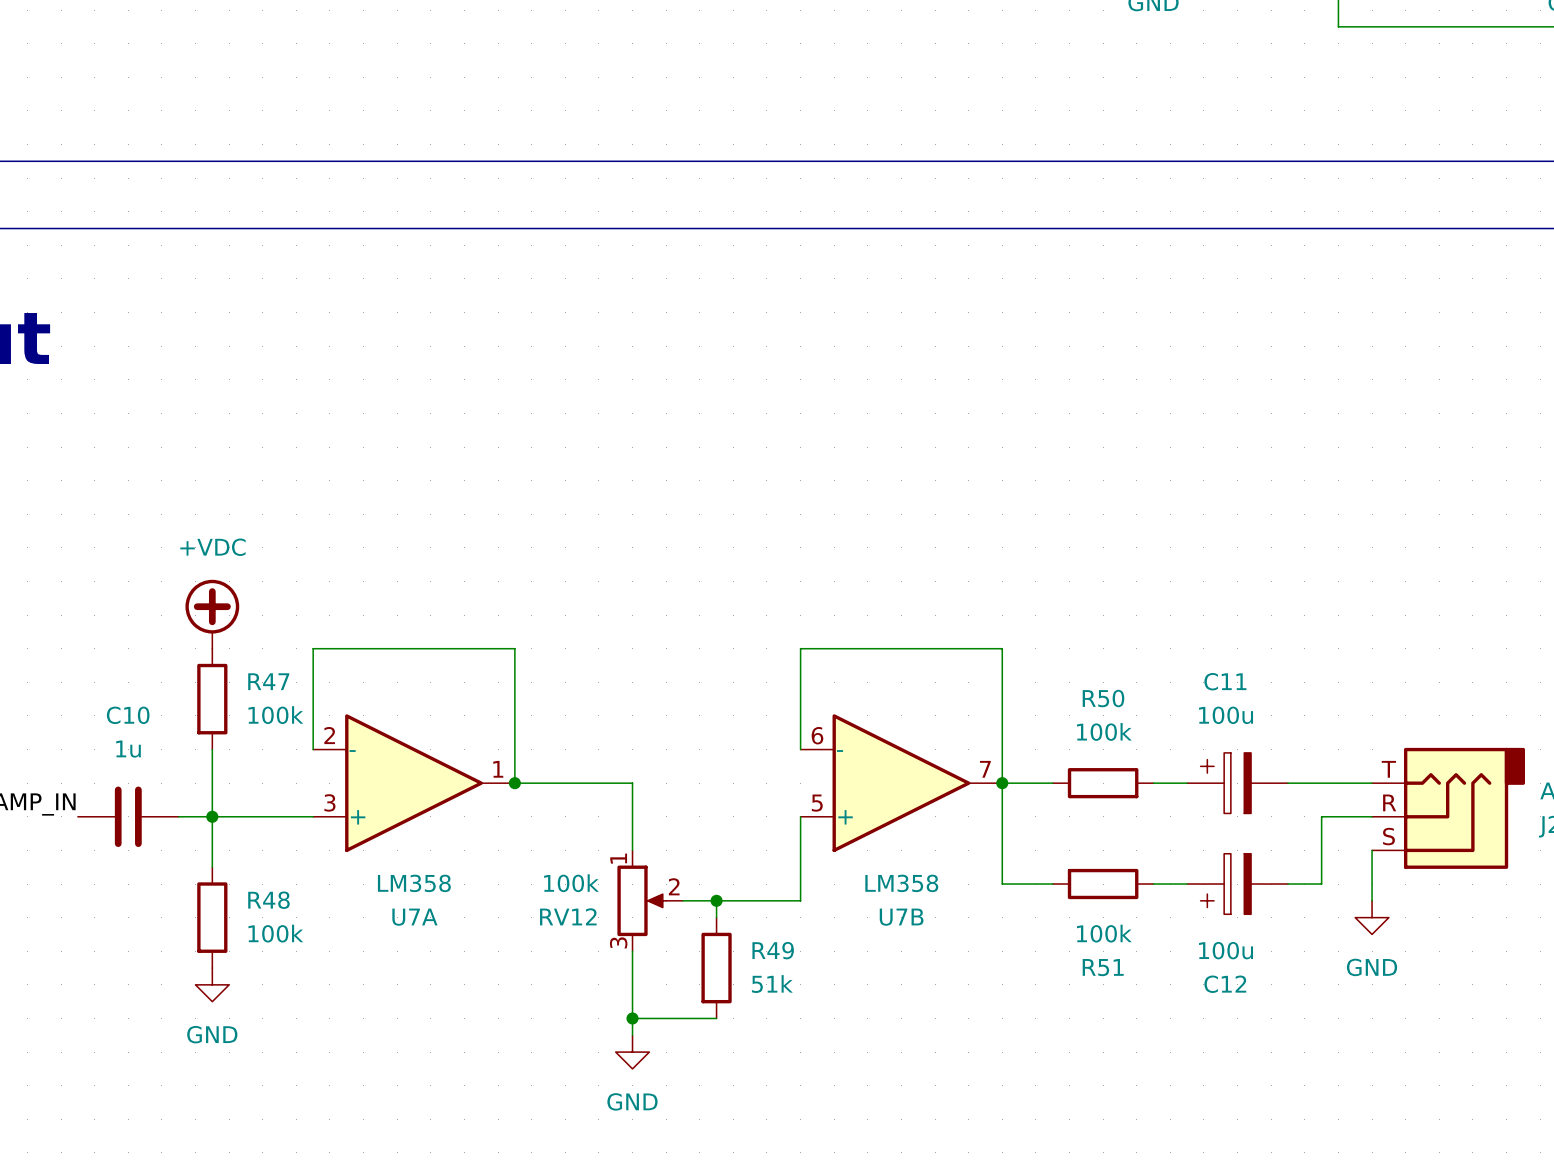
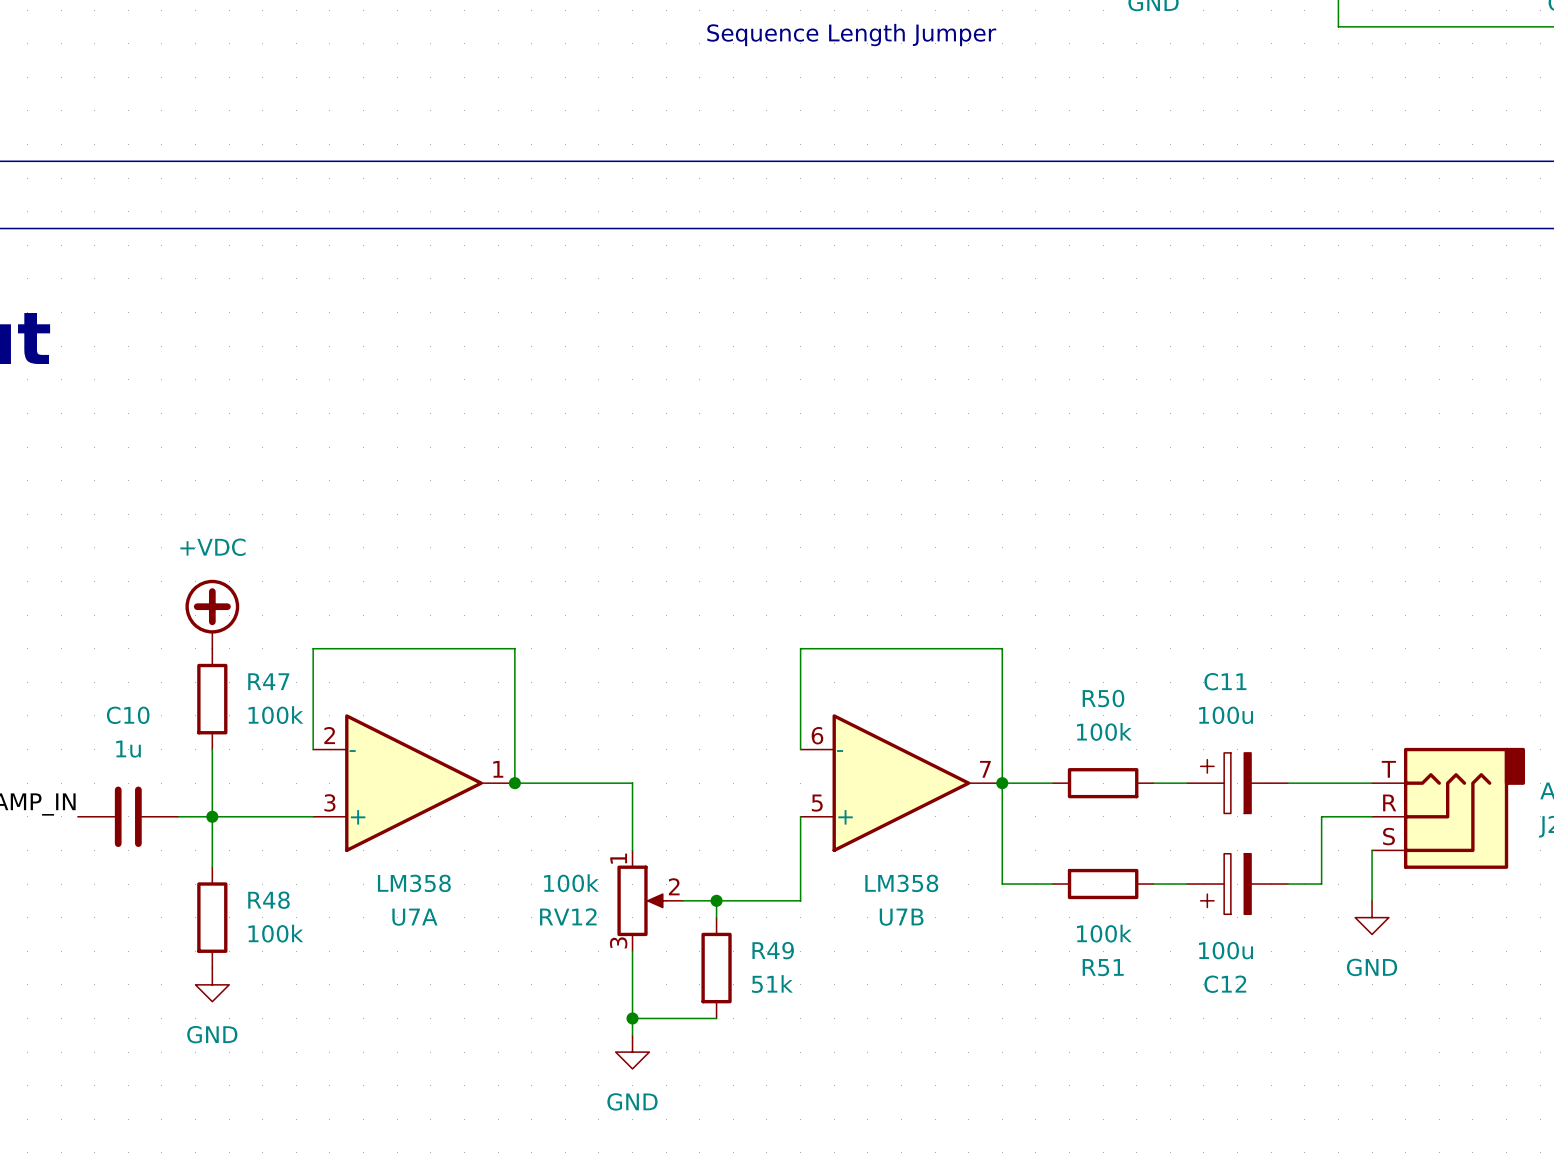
text: none -> Sequence Length Jumper (851, 35)

